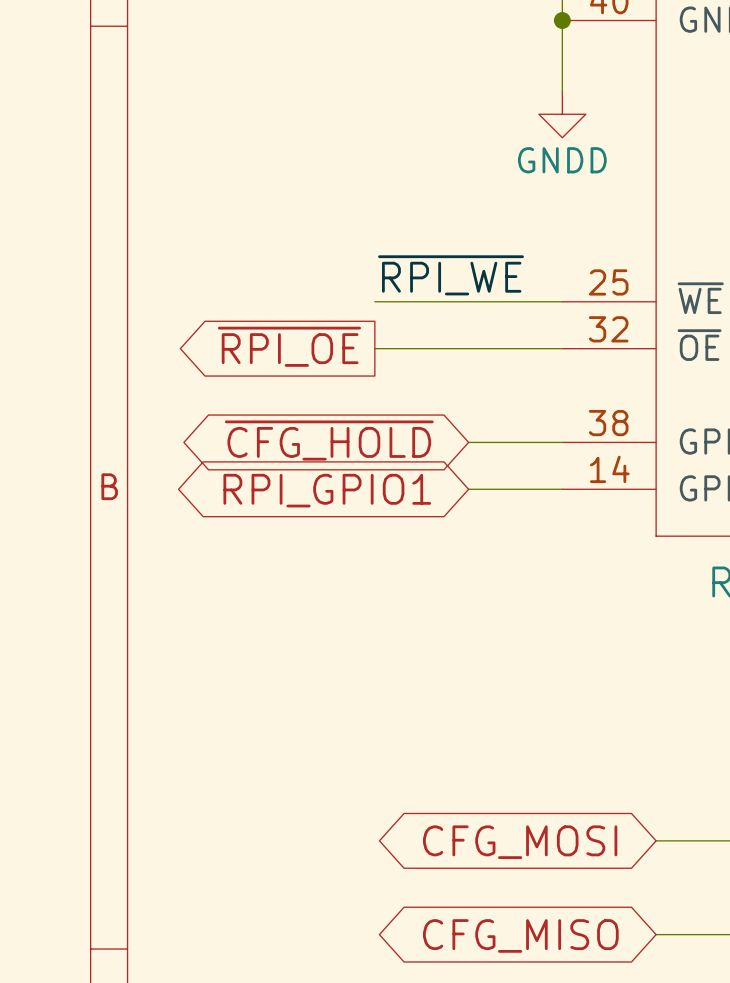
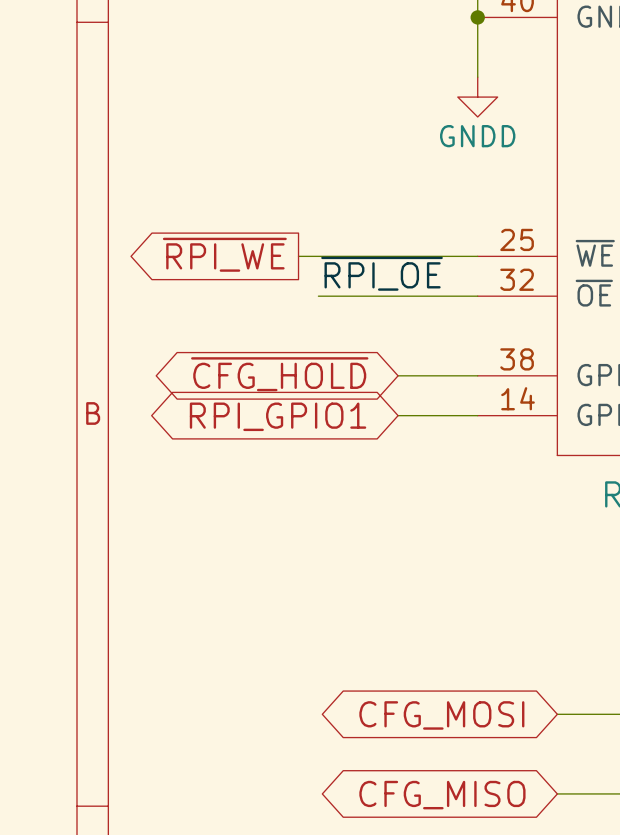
label: ~{RPI_WE} (451, 275) -> ~{RPI_OE} (382, 273)
wire: none -> (298, 256) (318, 256)
global label: ~{RPI_OE} (289, 346) -> ~{RPI_WE} (224, 254)

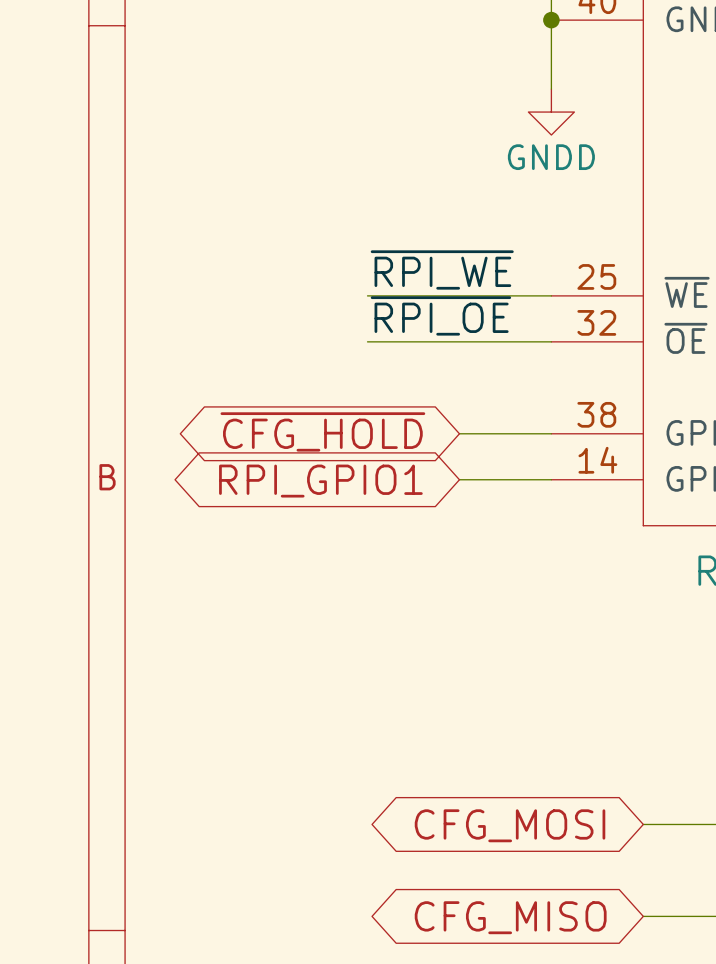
label: none -> ~{RPI_WE} (442, 269)
global label: ~{RPI_WE} (224, 254) -> none
wire: (298, 256) (318, 256) -> none

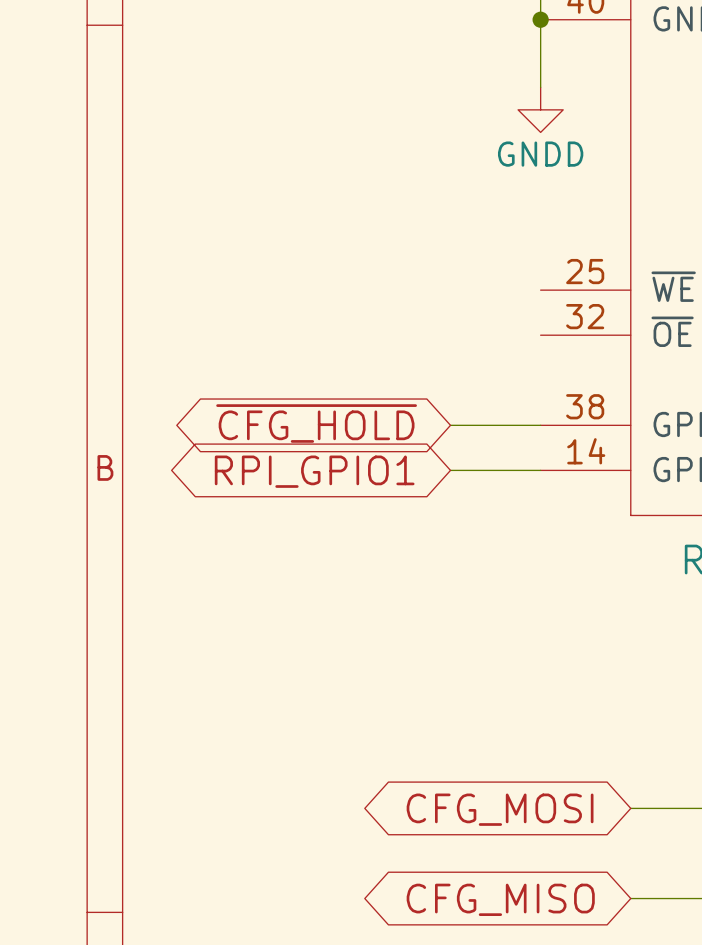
label: ~{RPI_WE} (442, 269) -> none
wire: (367, 295) (551, 295) -> none
label: ~{RPI_OE} (440, 315) -> none
wire: (367, 341) (551, 341) -> none

